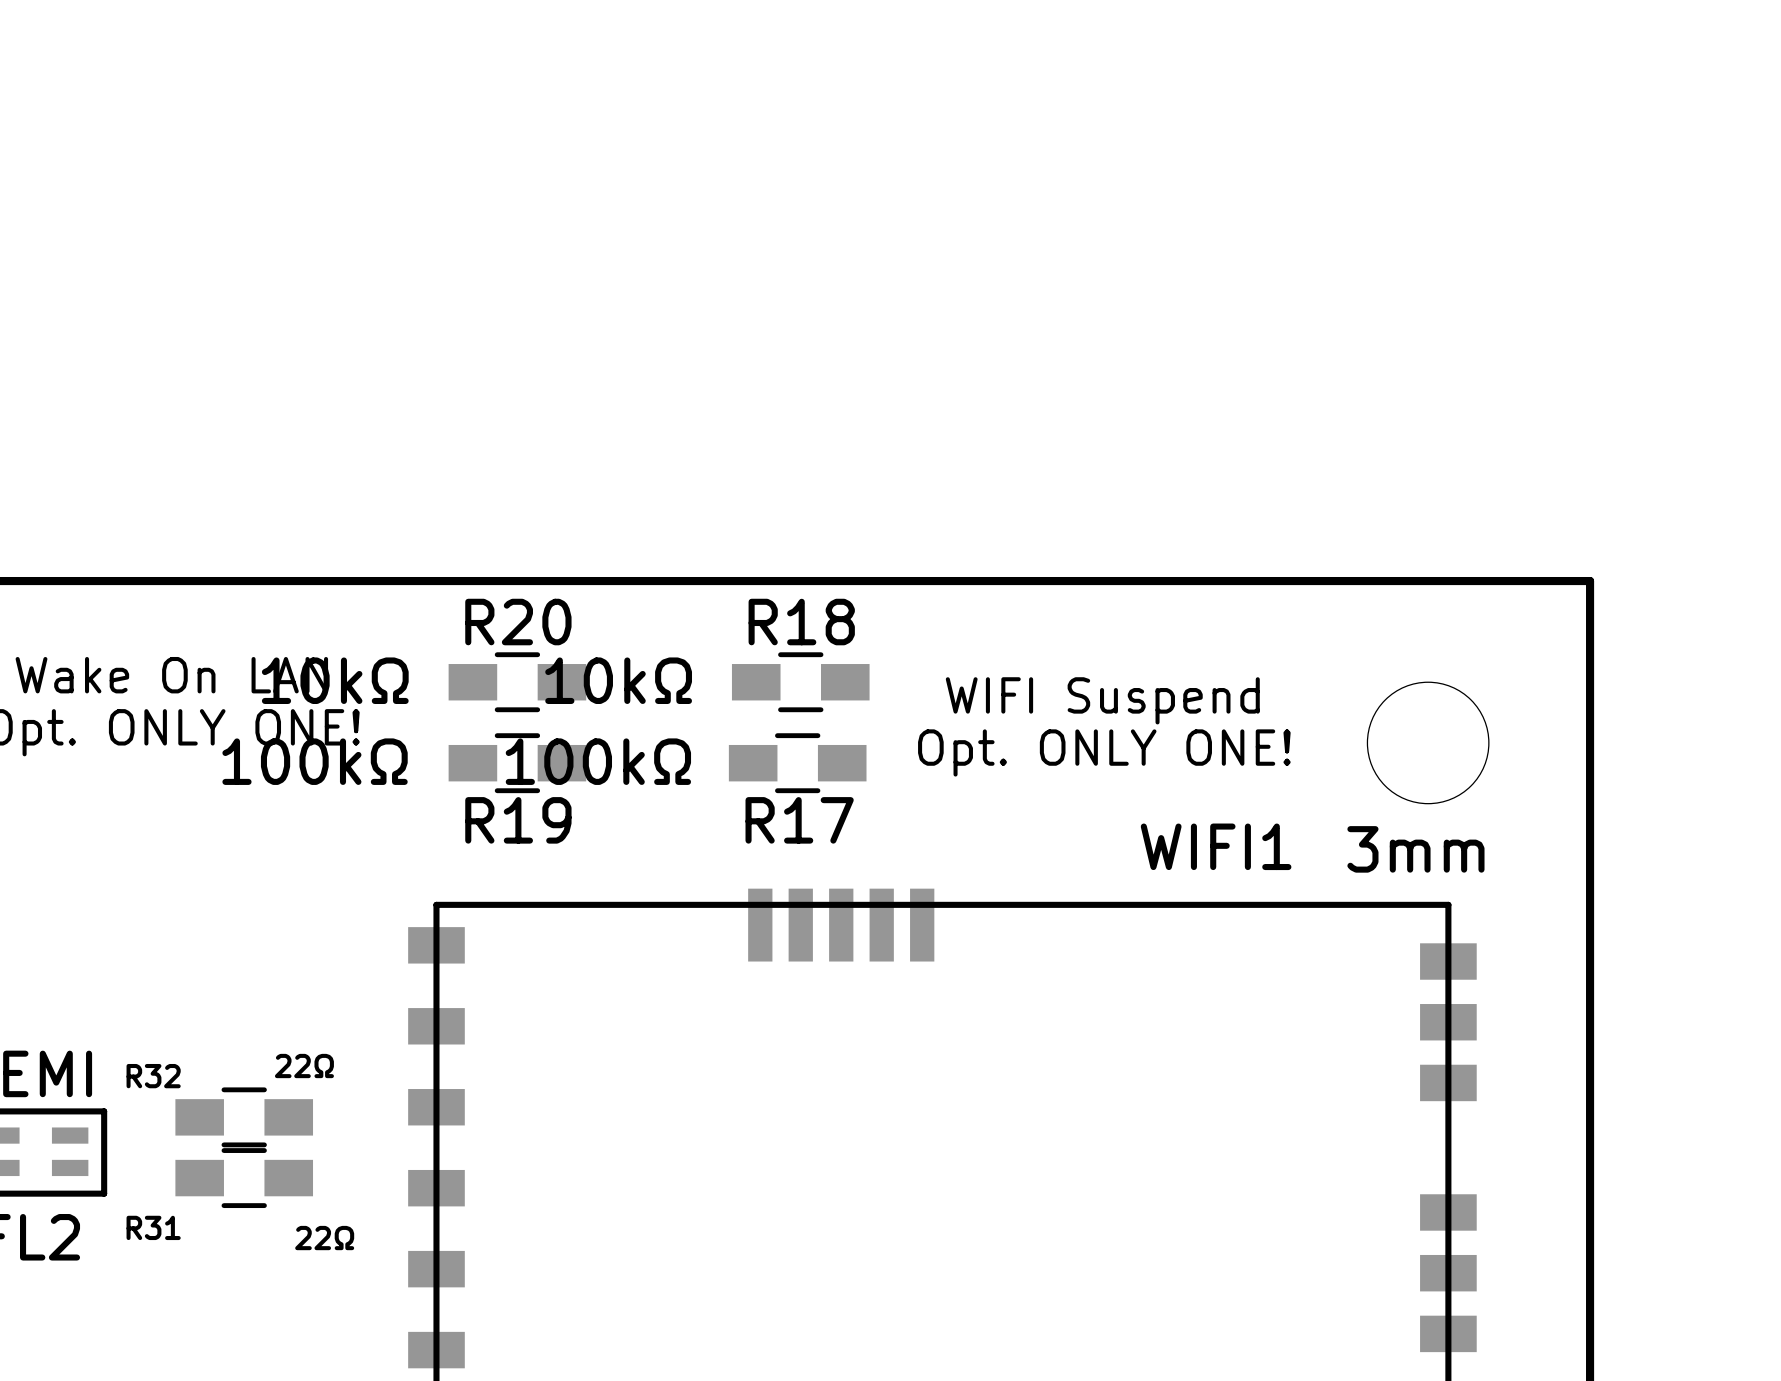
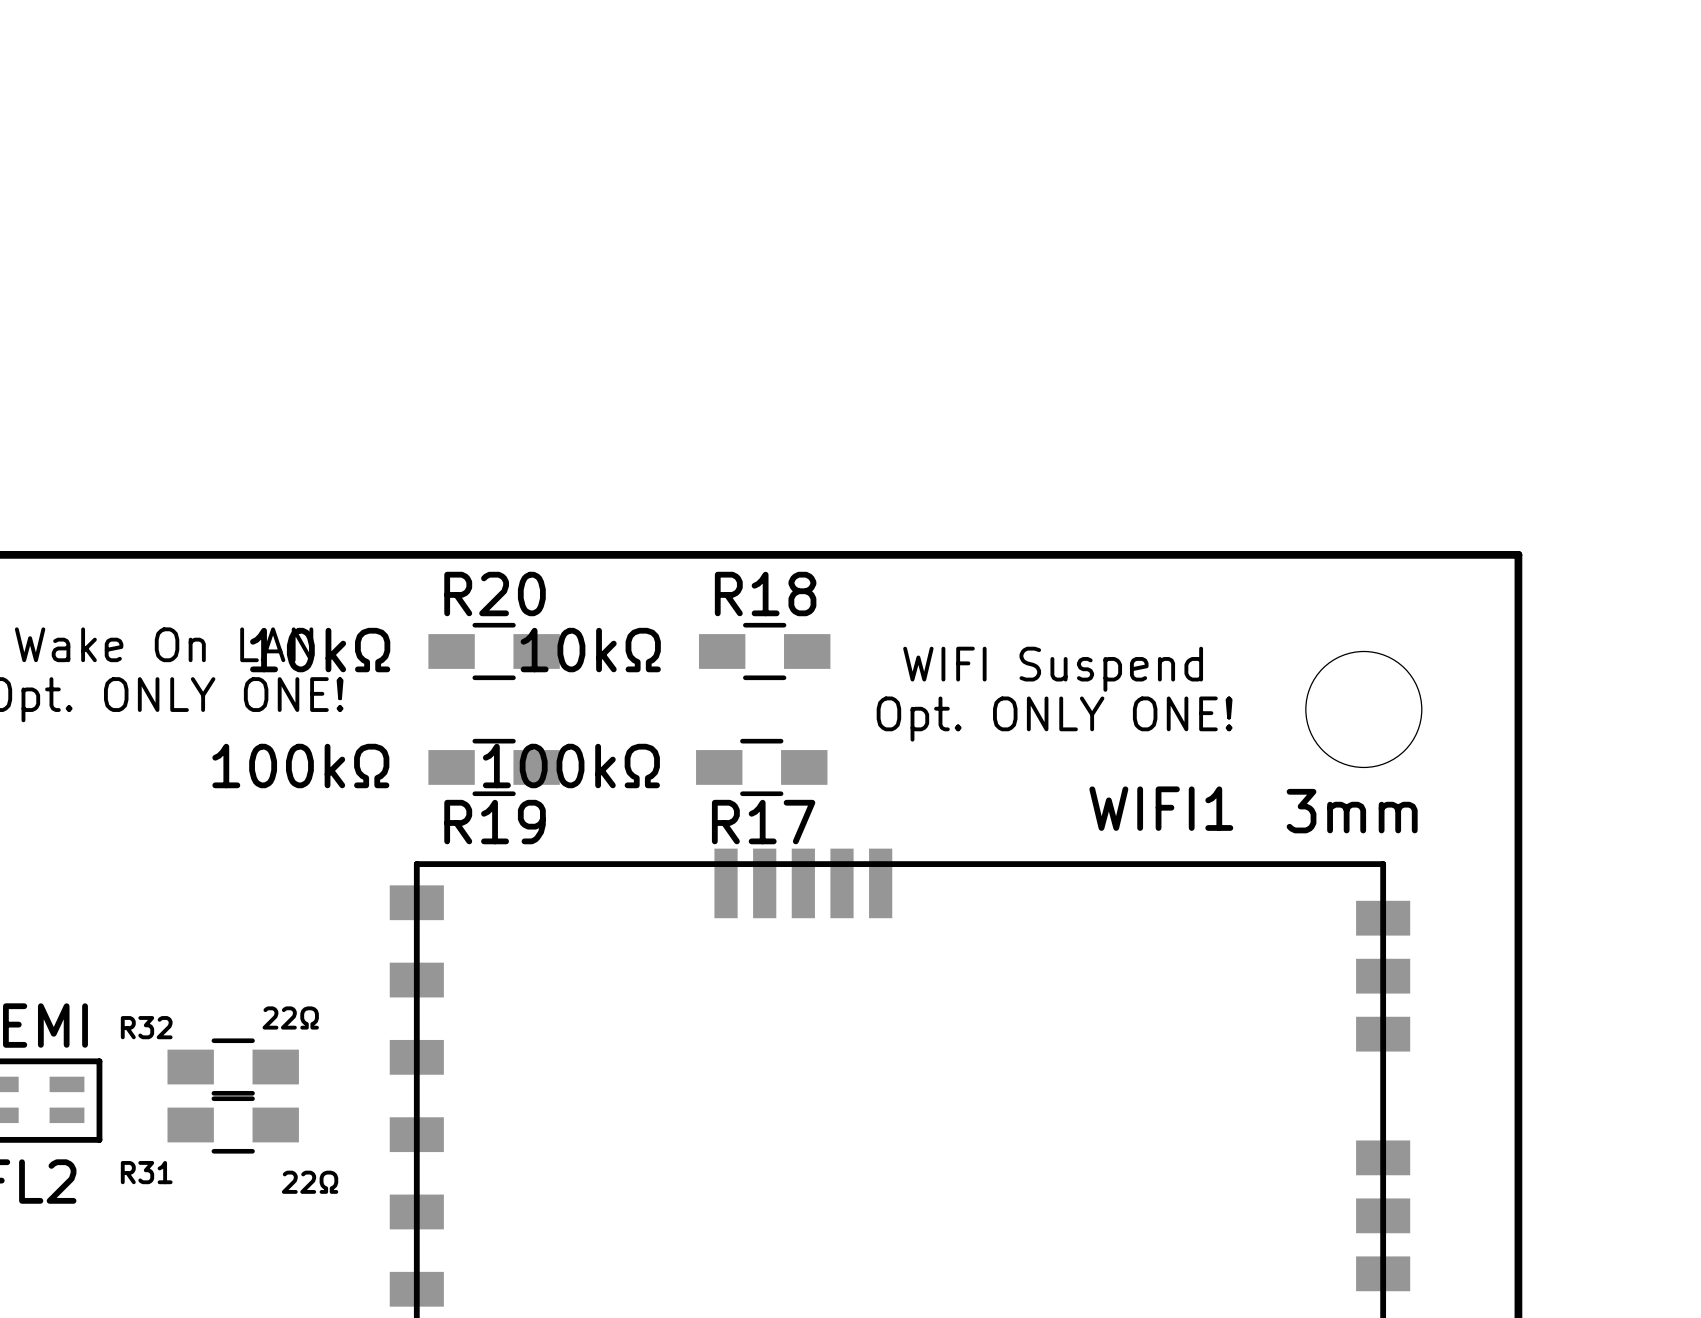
R19 position: (517, 763) -> (494, 767)
R17 position: (797, 763) -> (761, 767)

